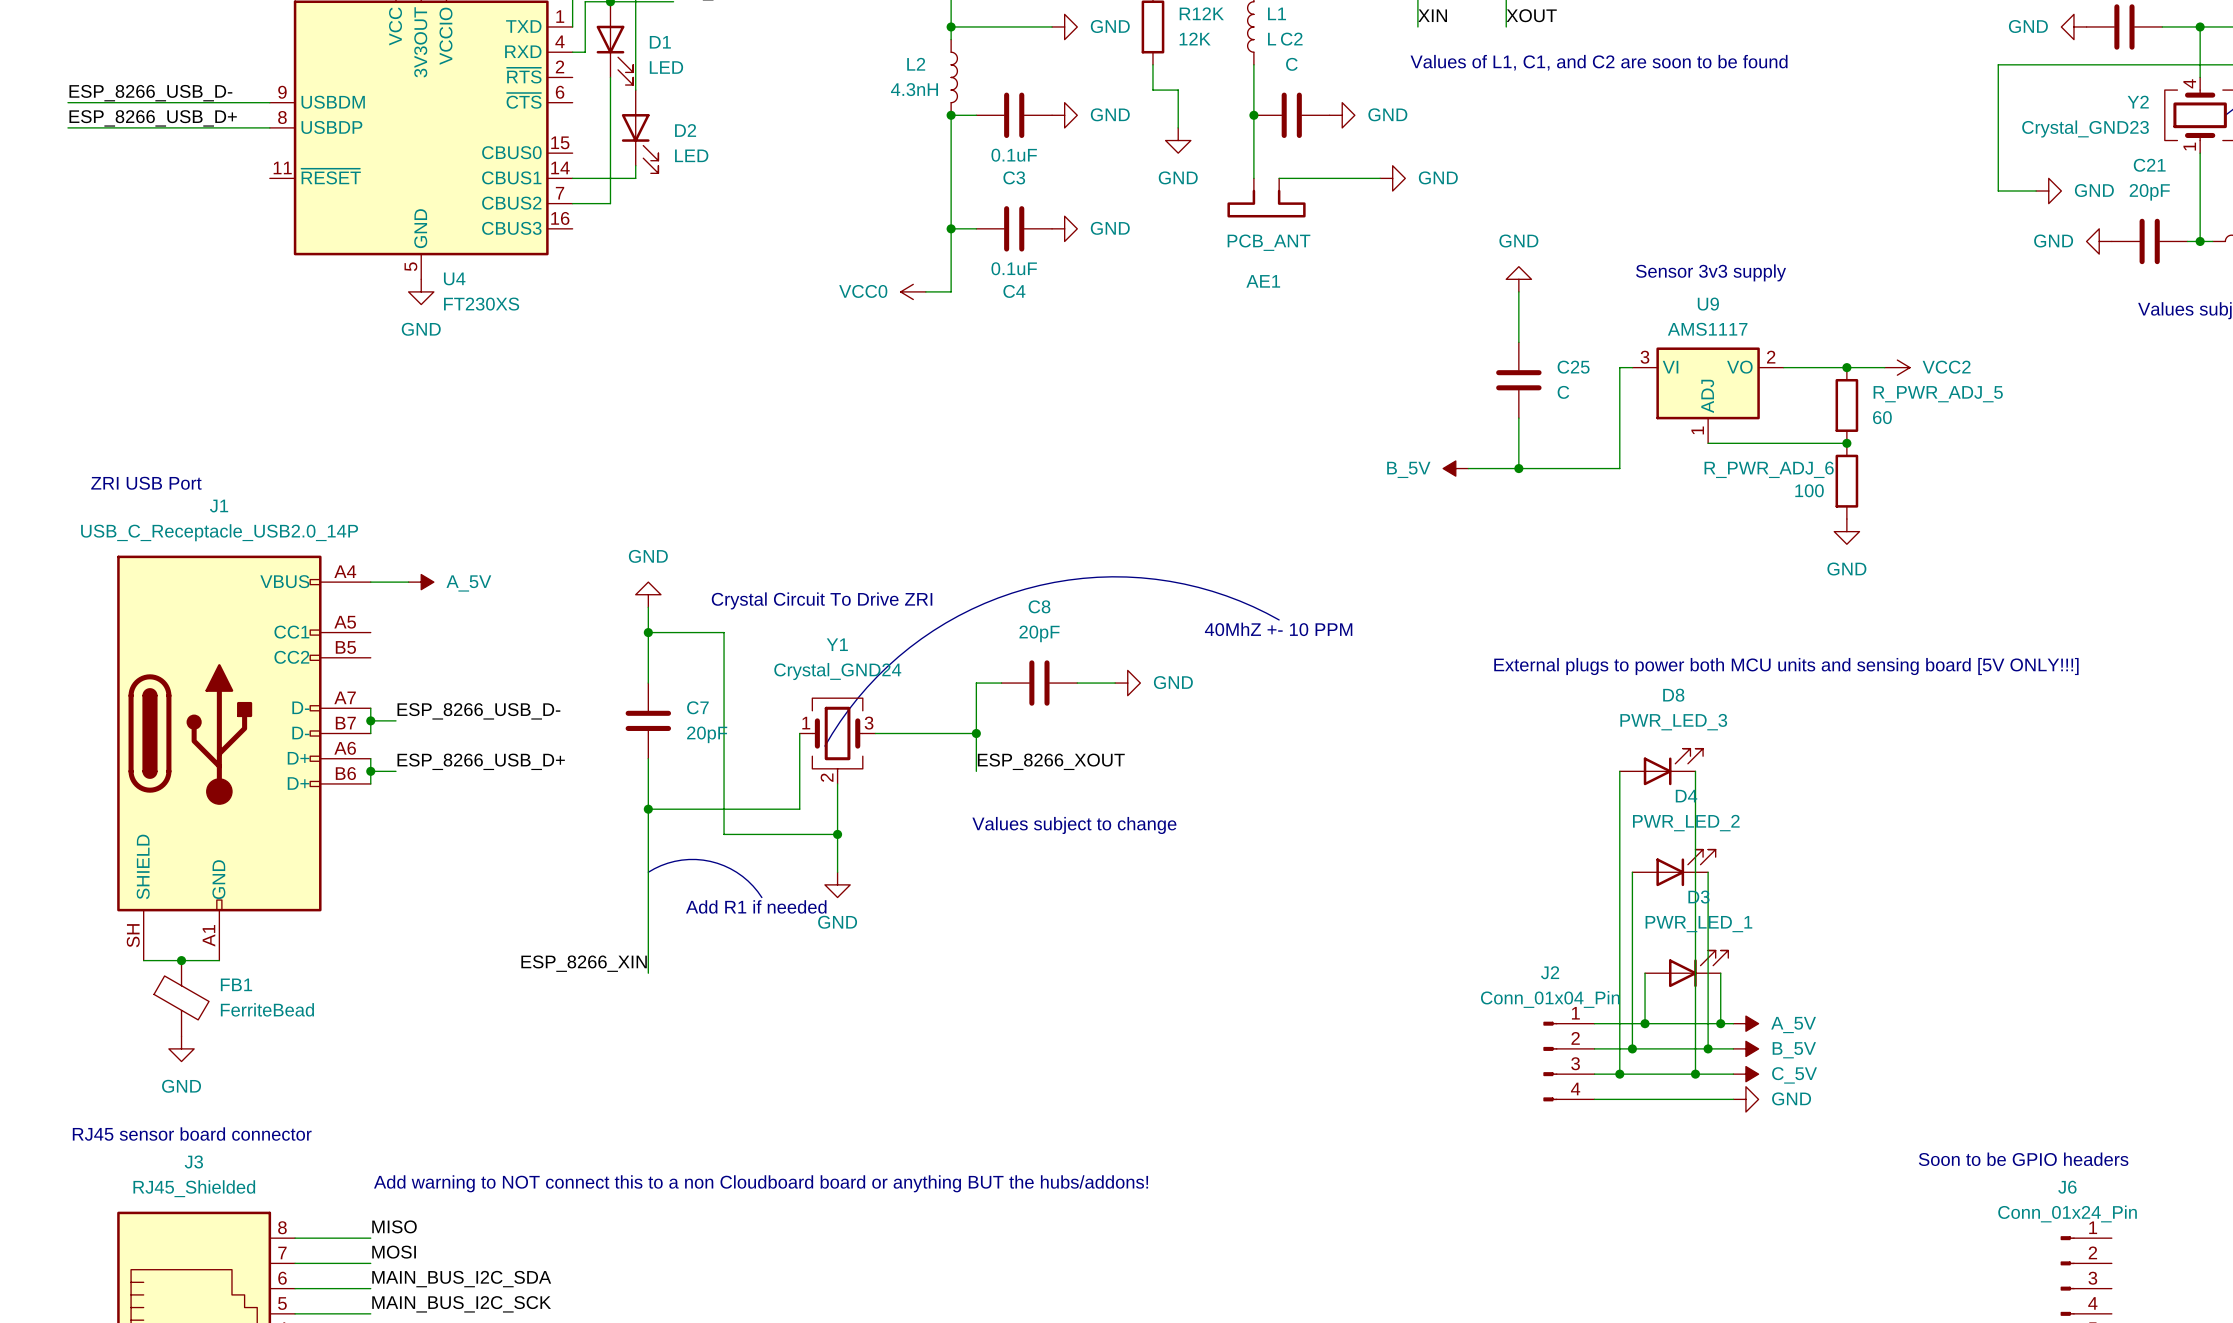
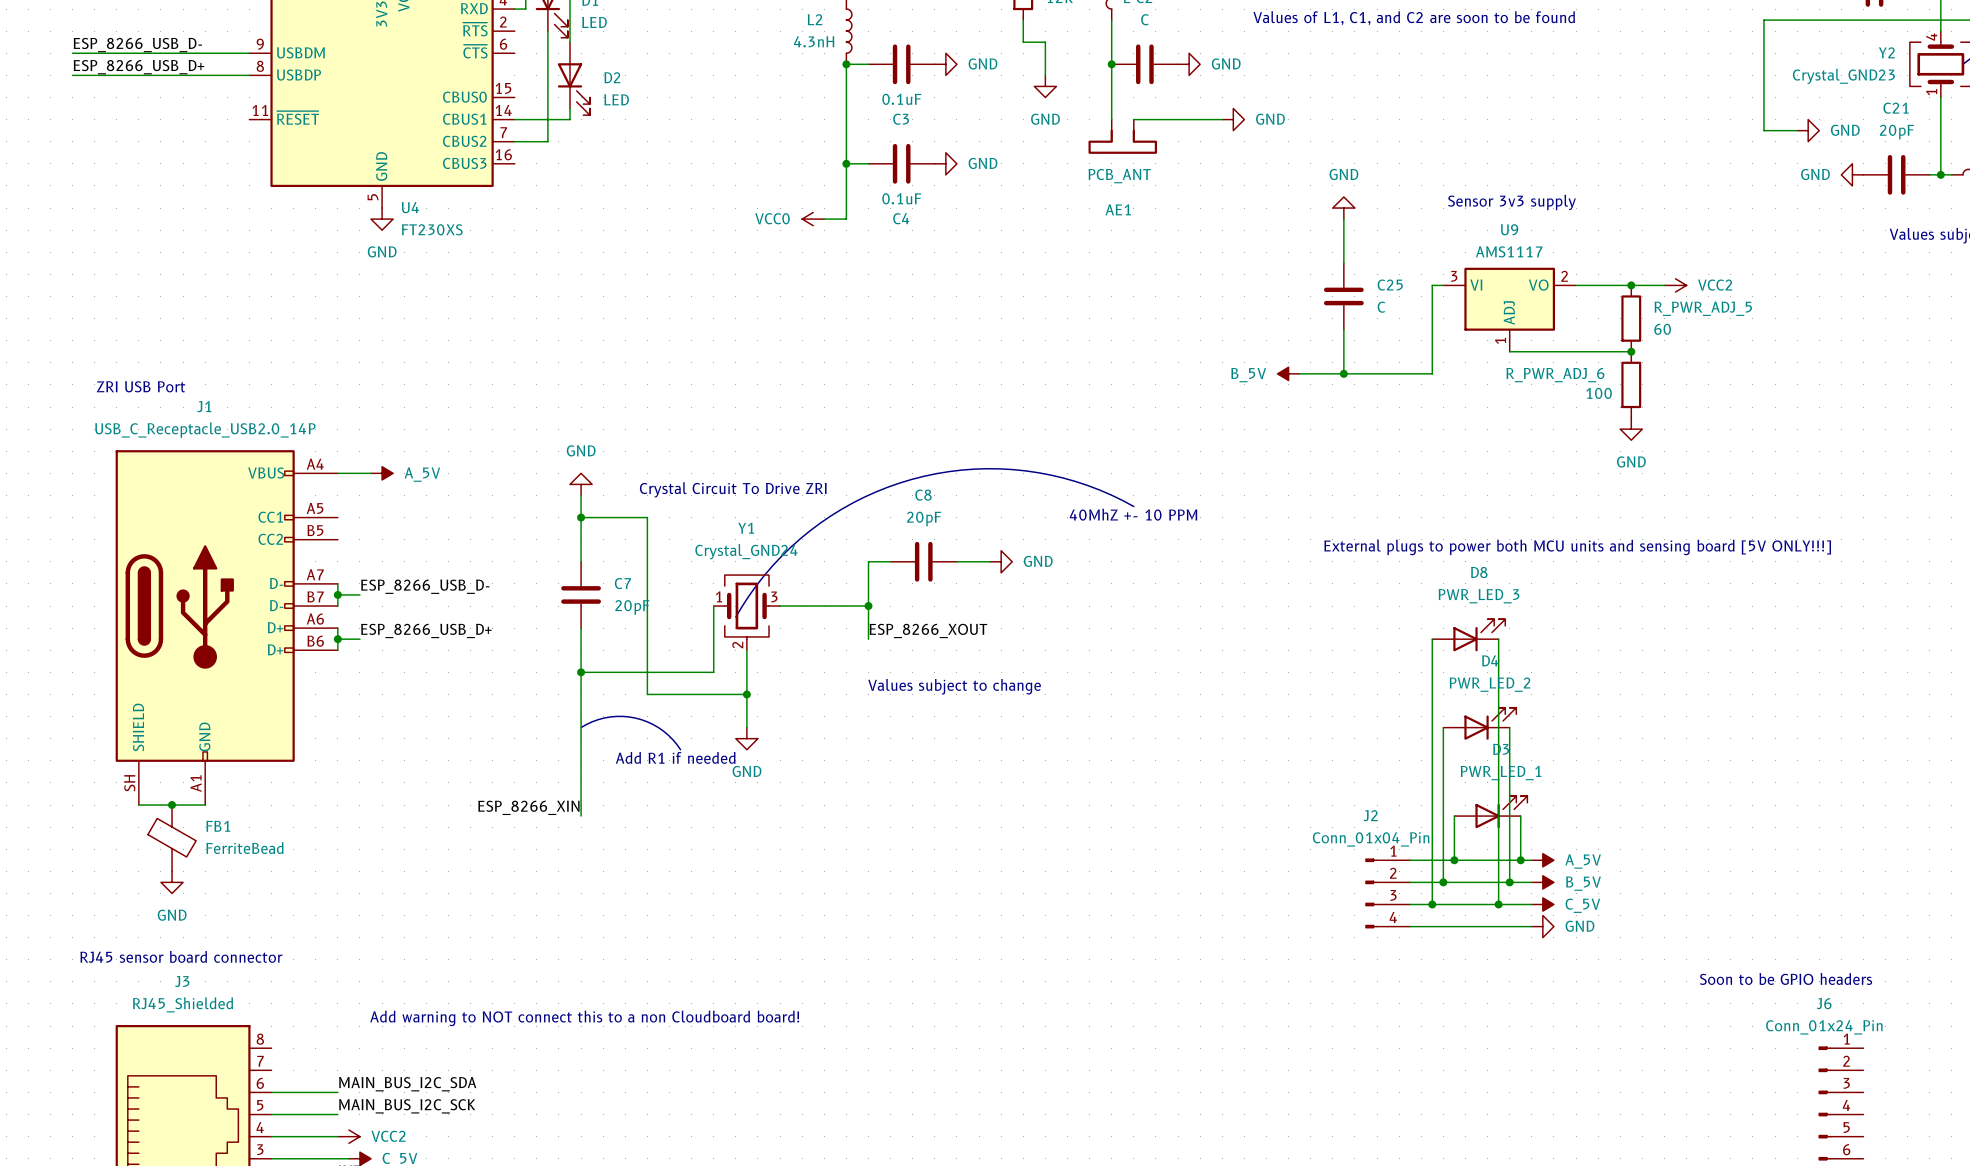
text: Add warning to NOT connect this to a non Cloudboard board or anything BUT the hubs/addons! (761, 1183) -> Add warning to NOT connect this to a non Cloudboard board! (584, 1018)
label: MISO (394, 1226) -> none
wire: (295, 1238) (370, 1238) -> none
label: MOSI (394, 1252) -> none
wire: (295, 1263) (370, 1263) -> none

